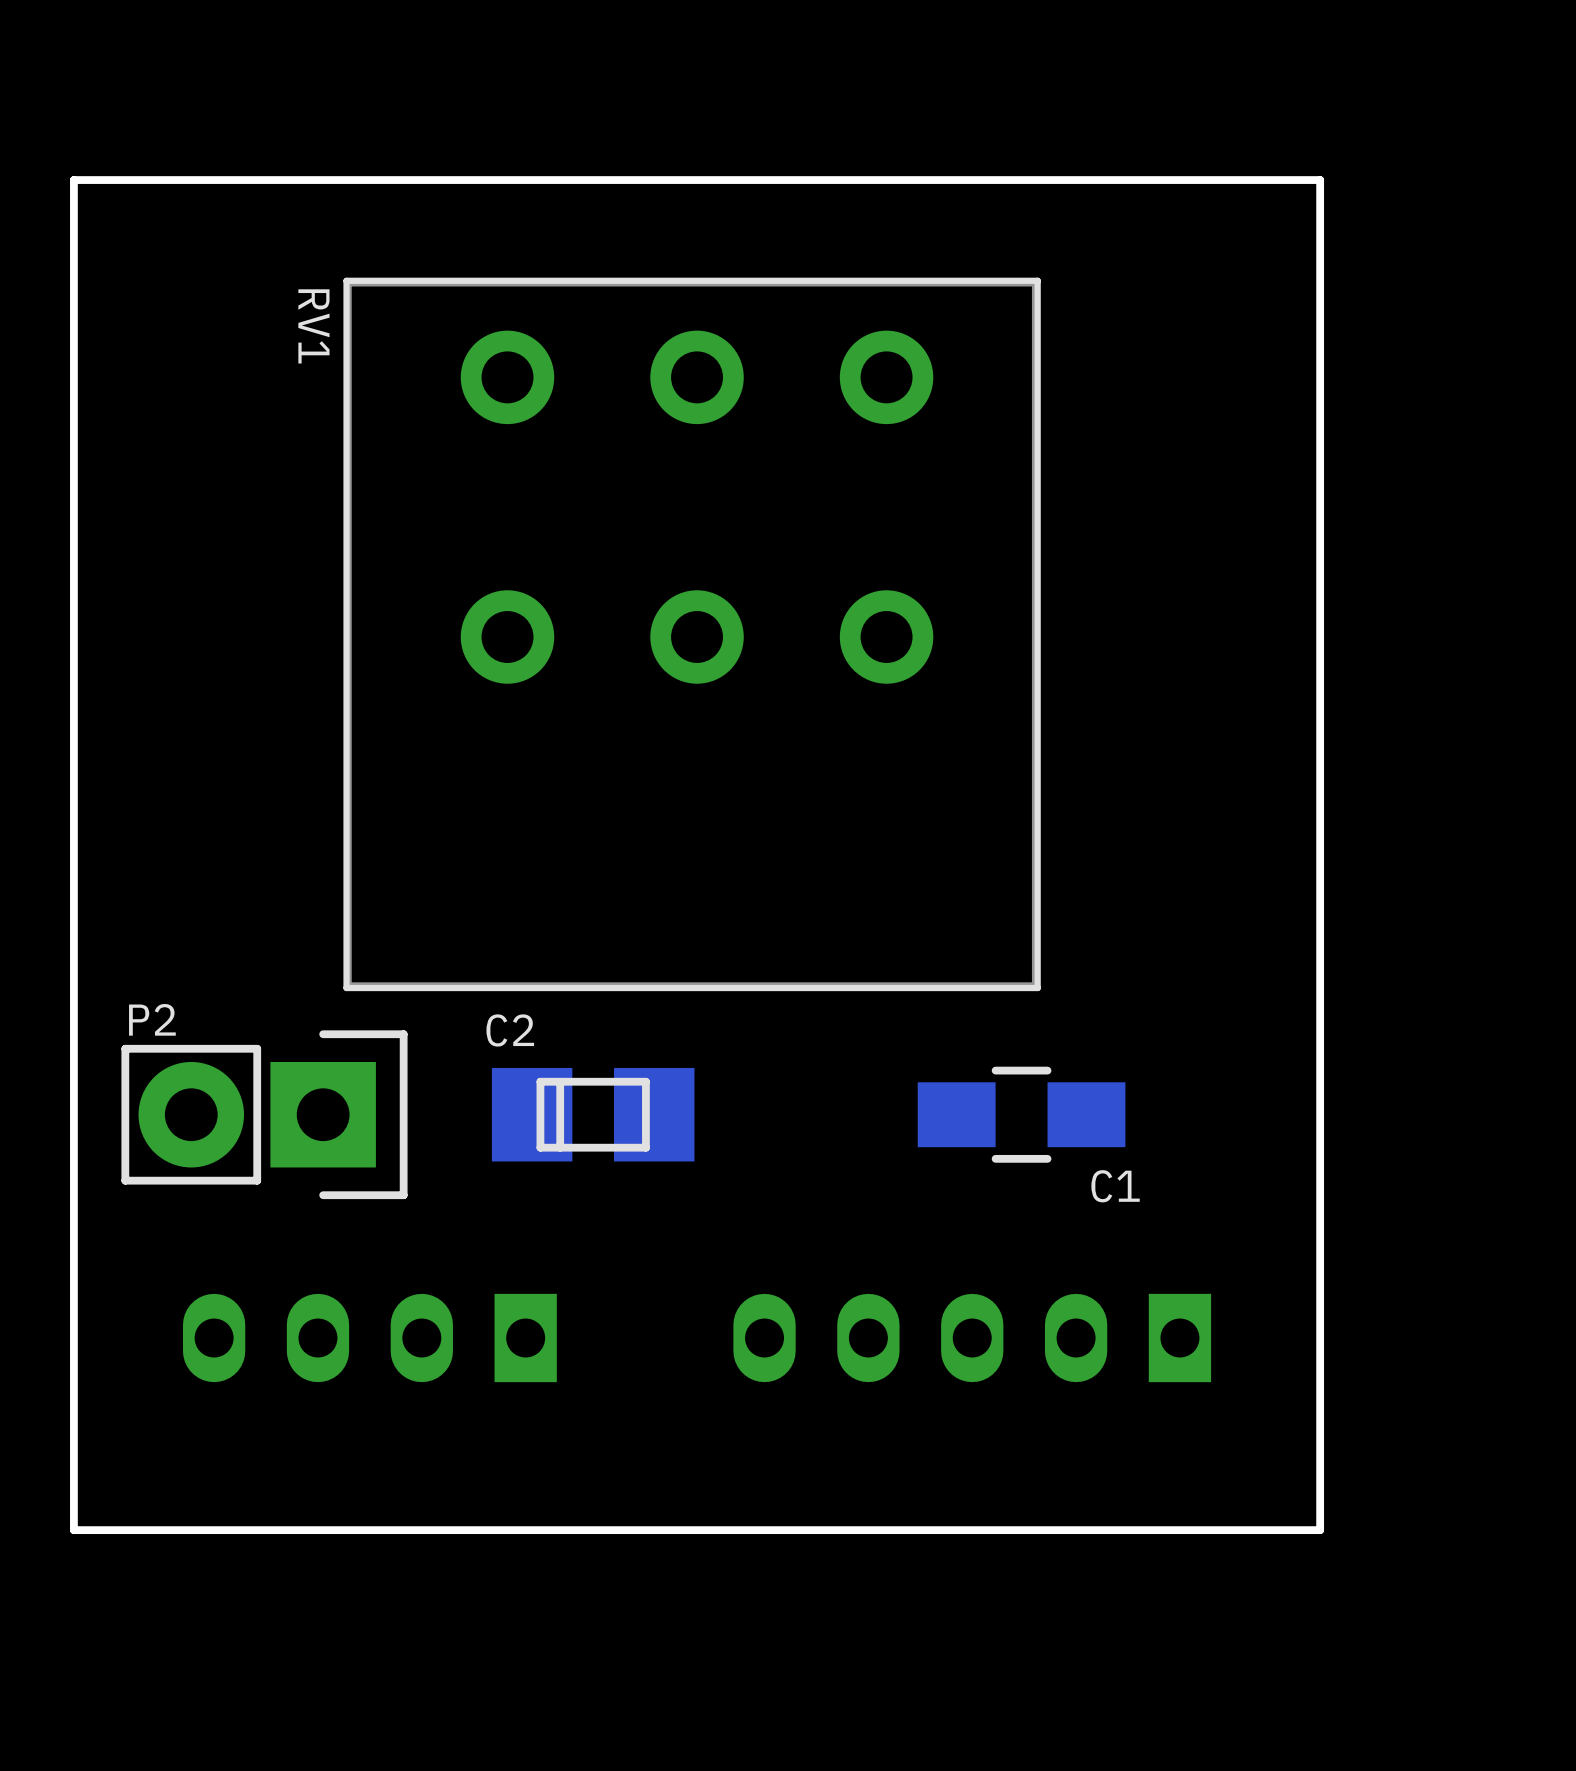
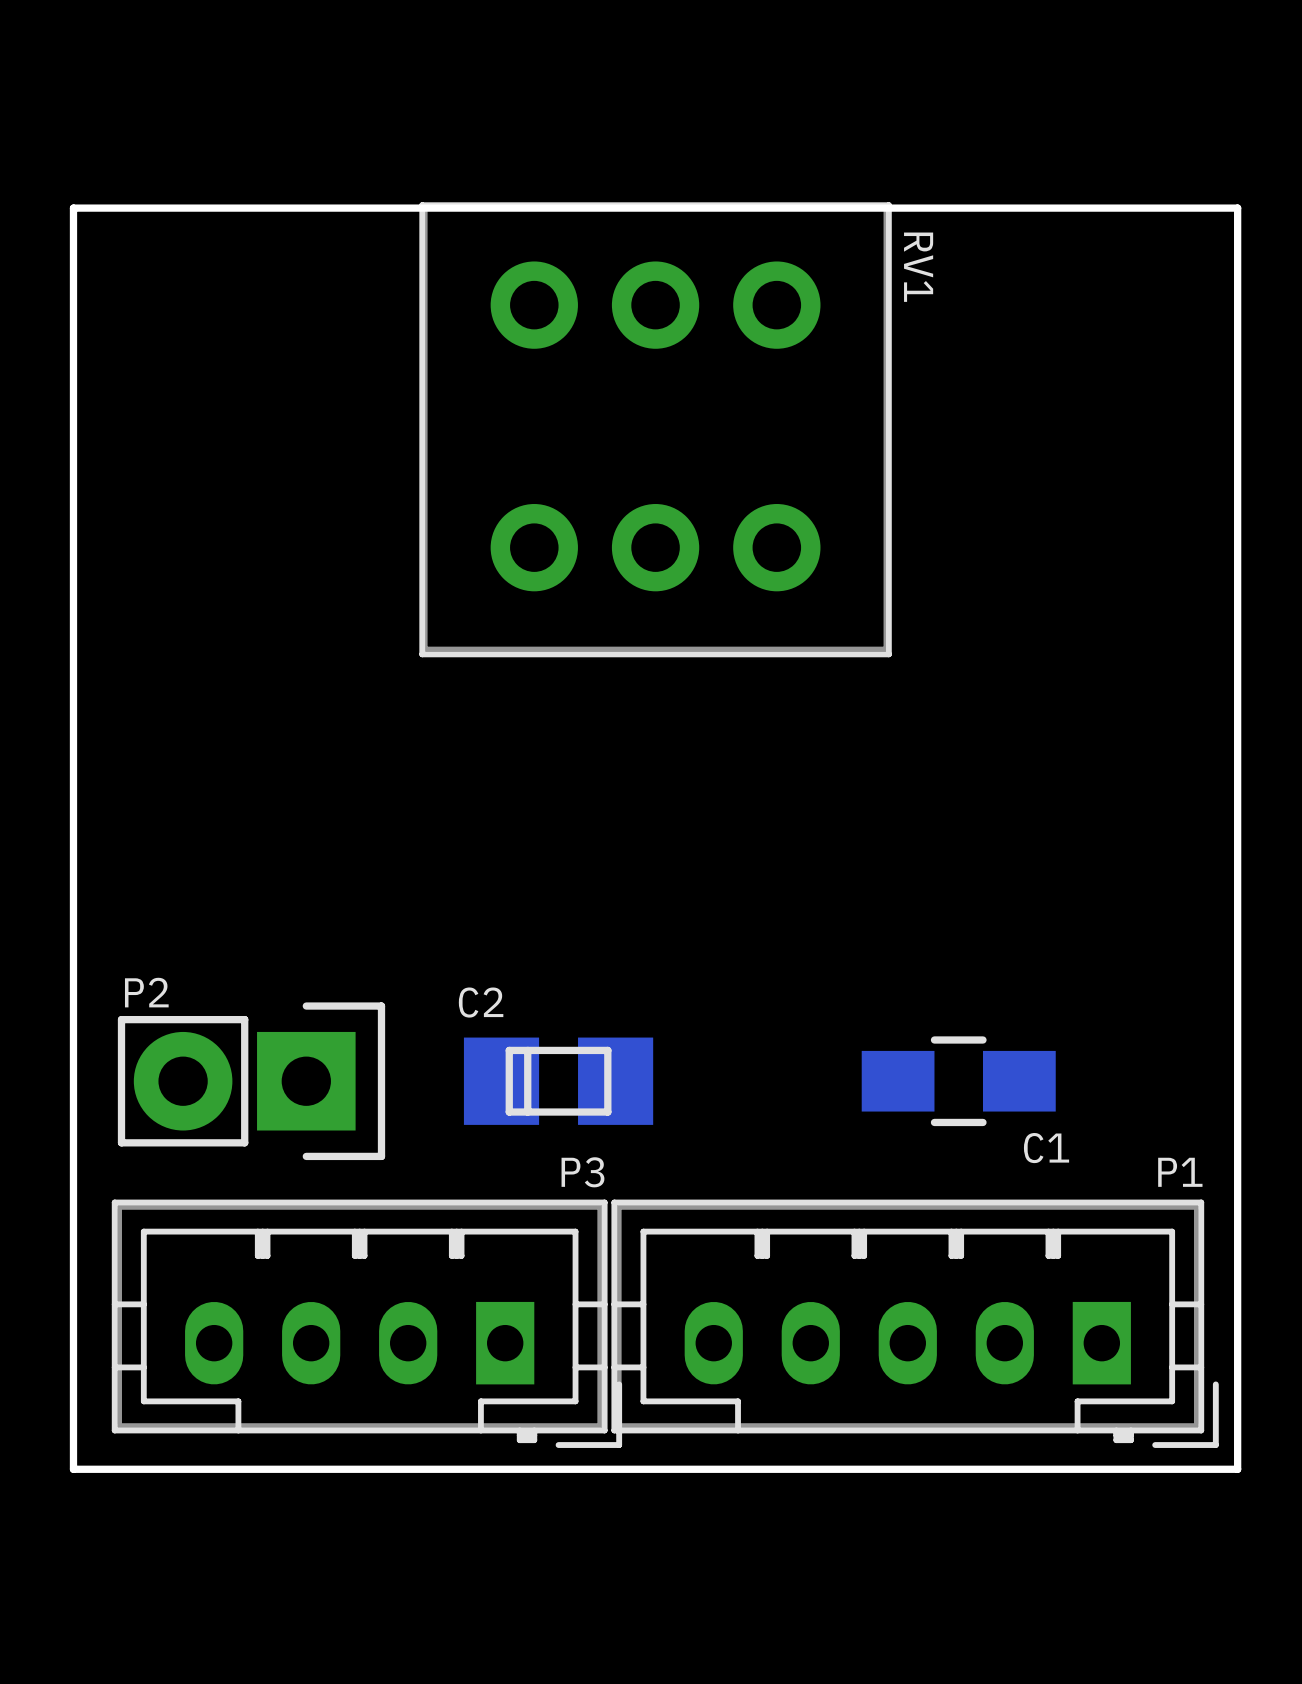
RV1 footprint: [343, 277, 1041, 992] -> [419, 202, 892, 658]
RV1 name position: RV1 (313, 326) -> RV1 (918, 267)
P3 side: top (369, 1338) -> bottom (366, 1323)
P1 side: top (972, 1338) -> bottom (915, 1323)

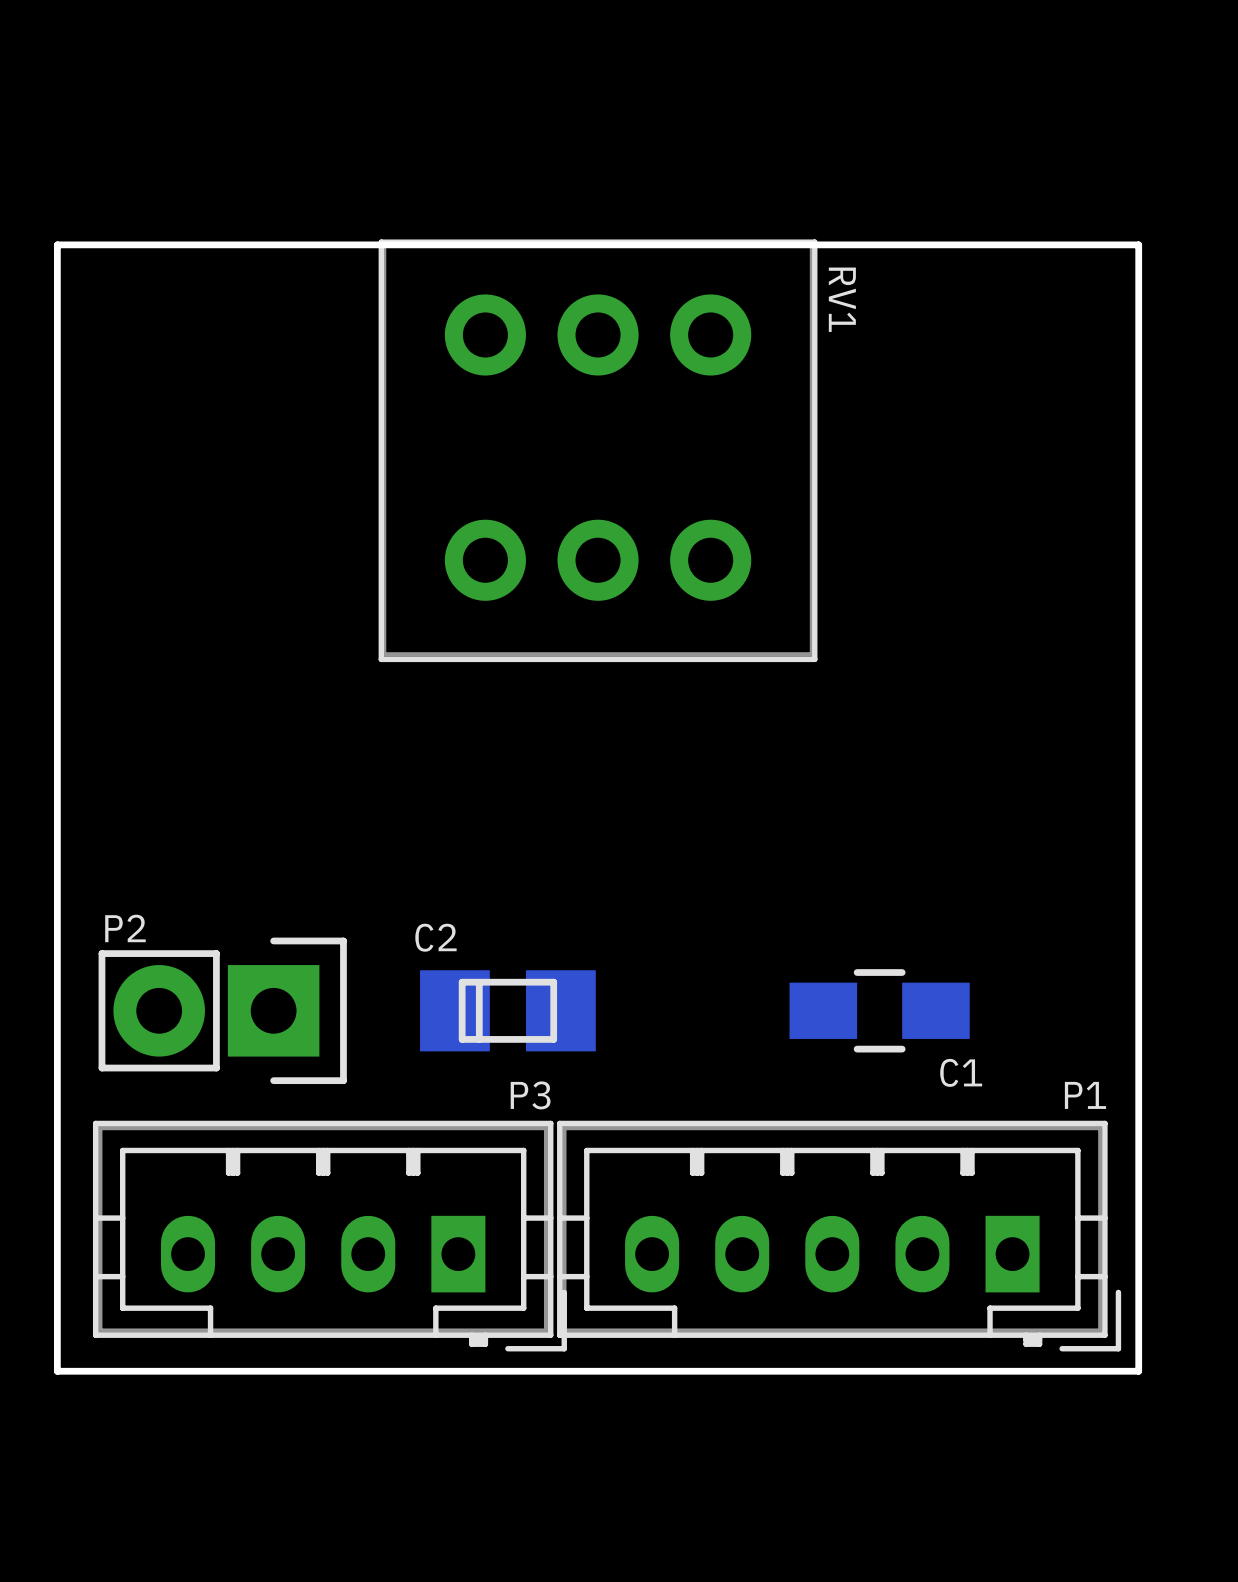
board edge: (1237, 256) (1237, 208) (73, 208) (73, 256) -> (1138, 244) (57, 244)
RV1 position: (655, 429) -> (598, 450)

